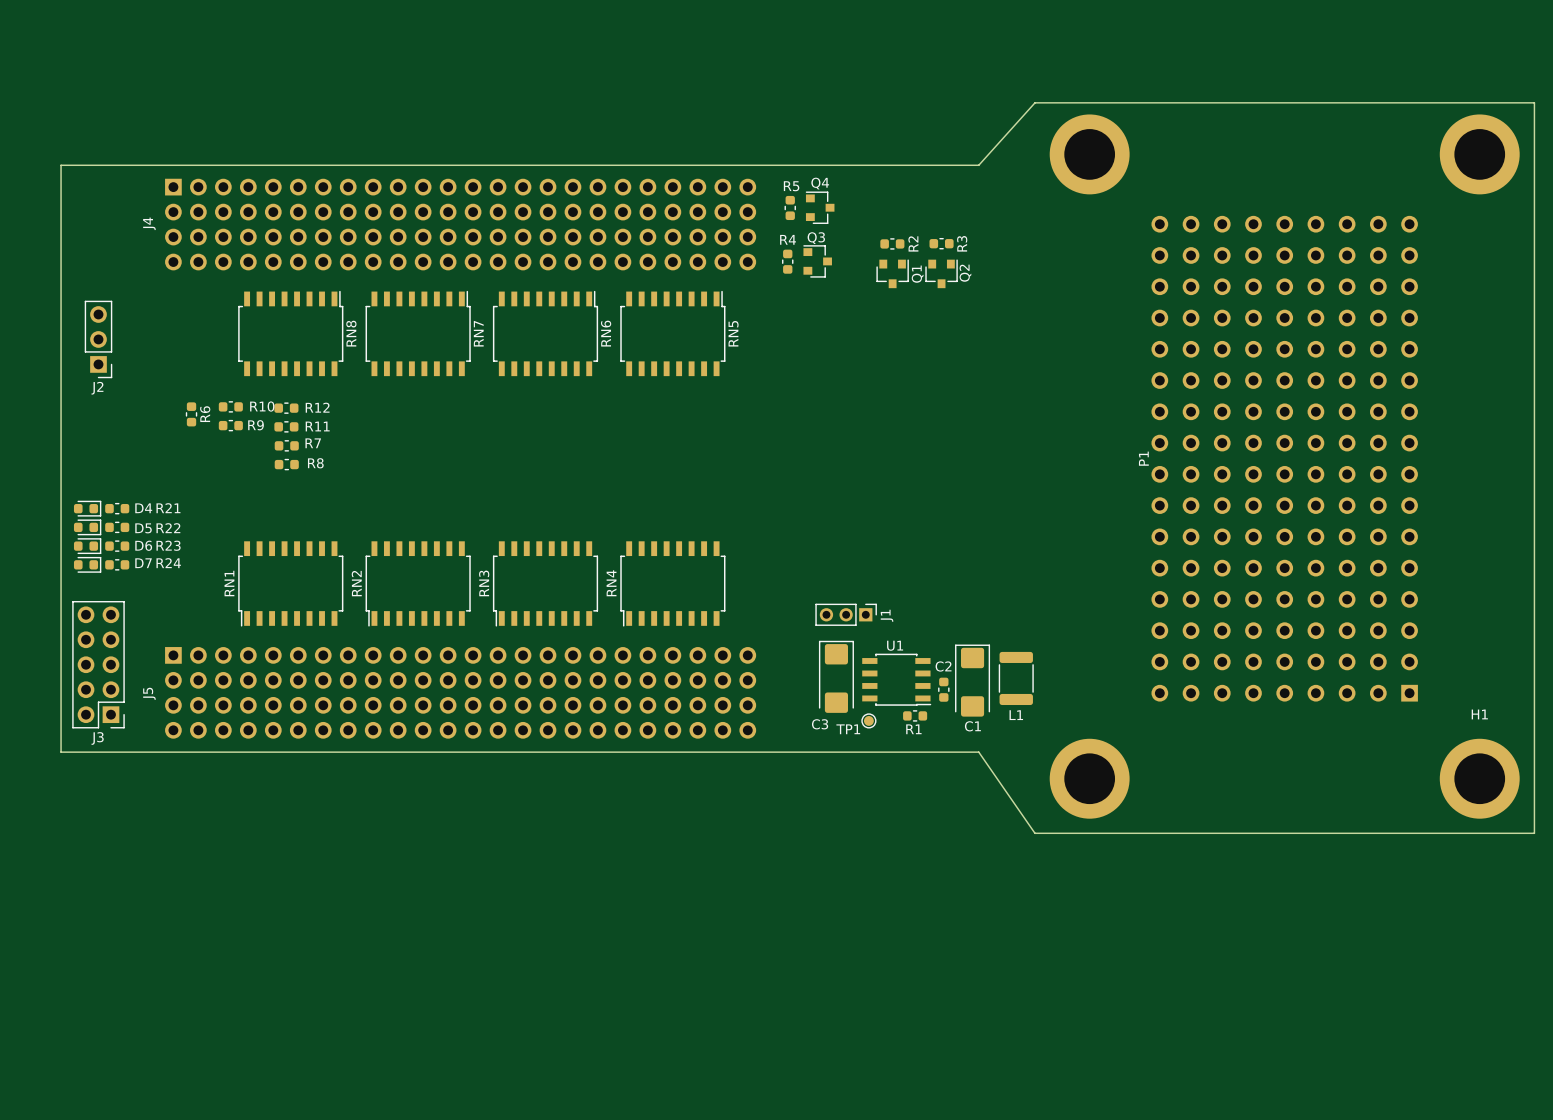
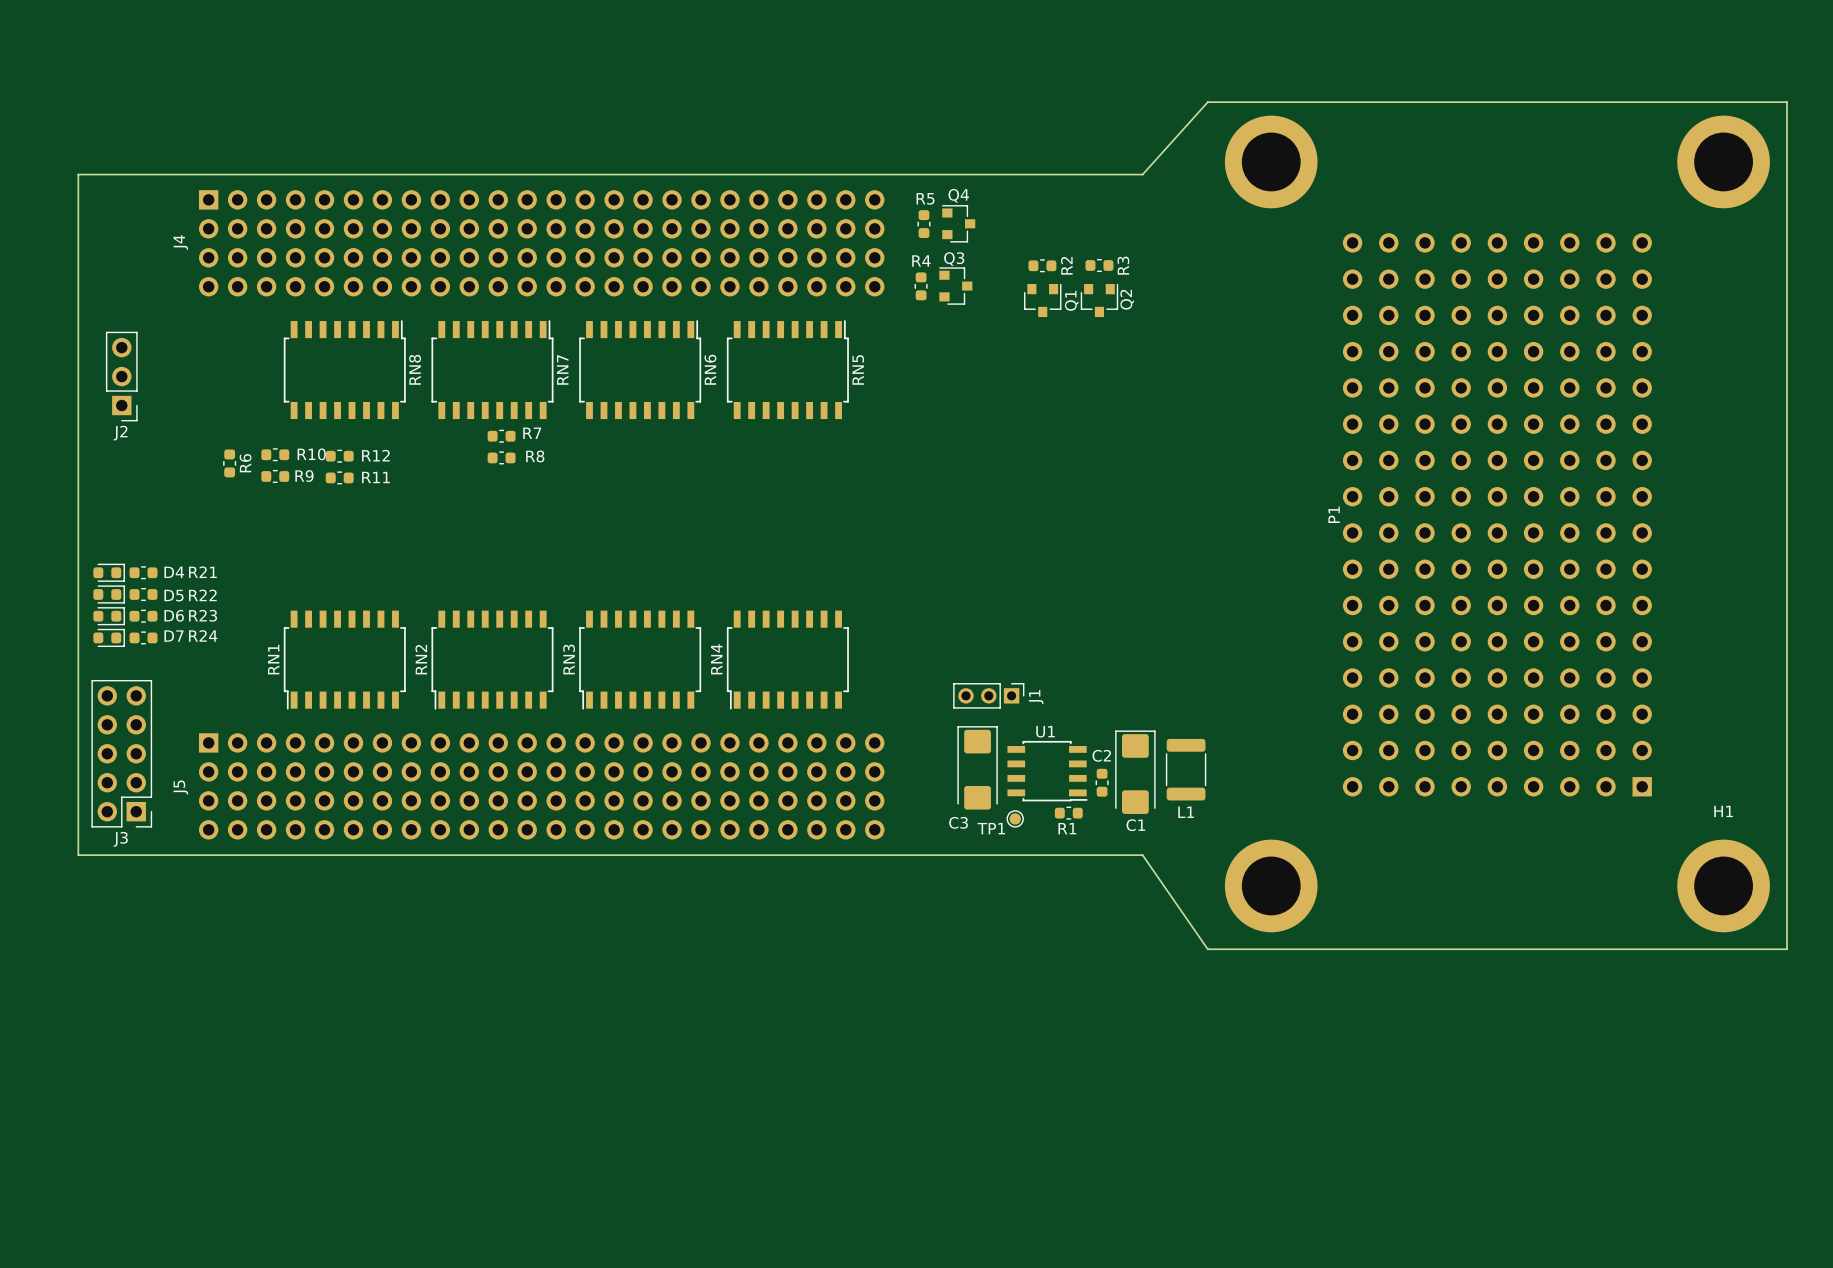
R7 position: (286, 445) -> (501, 436)
R8 position: (286, 464) -> (501, 457)

